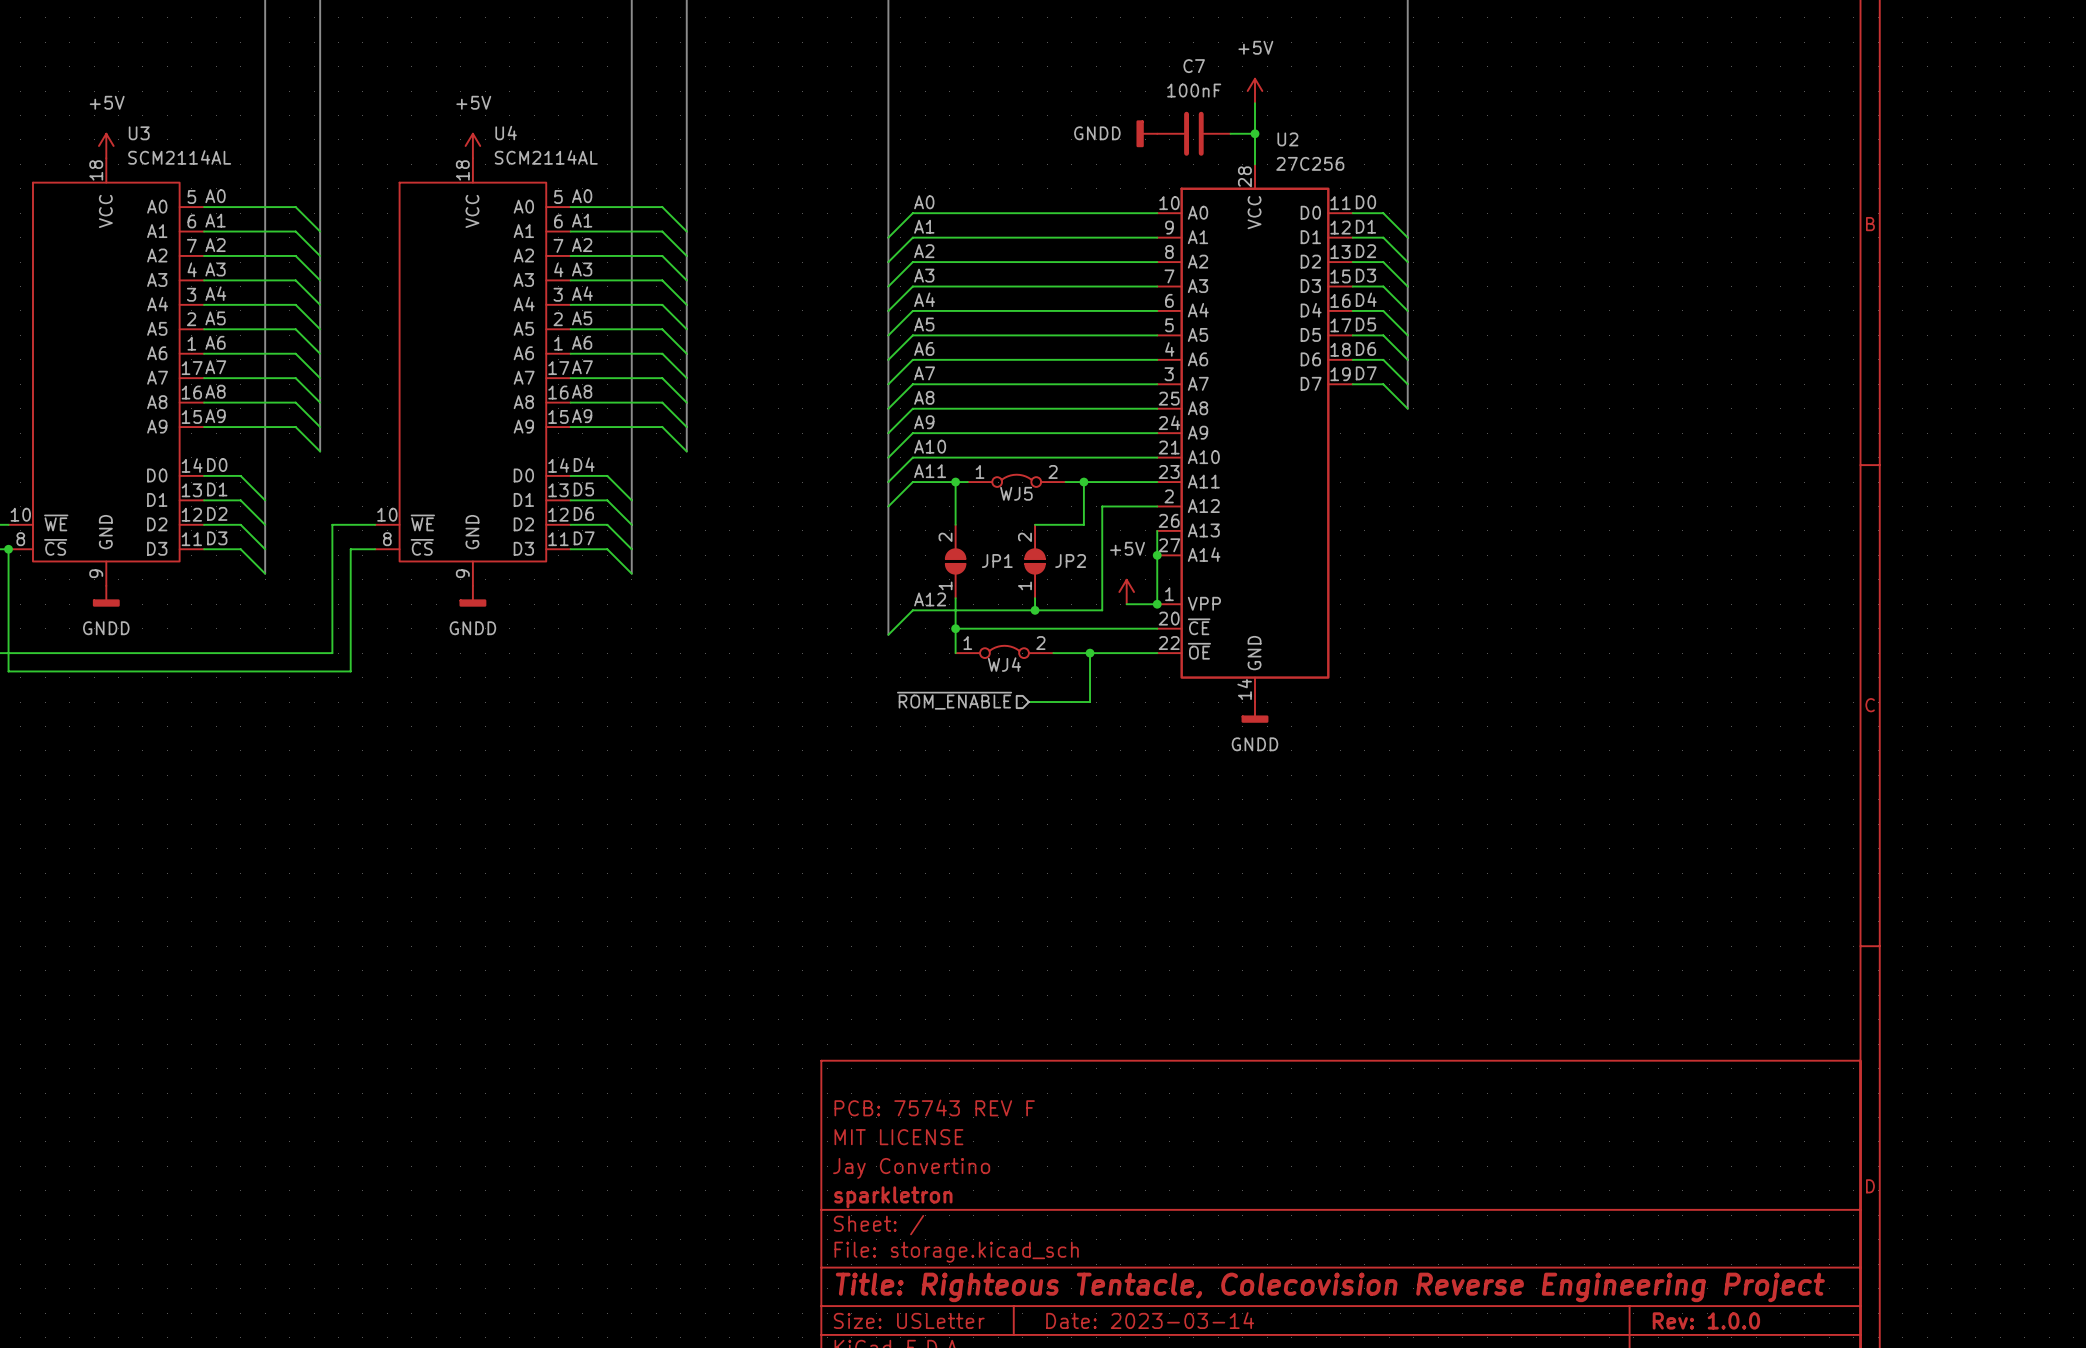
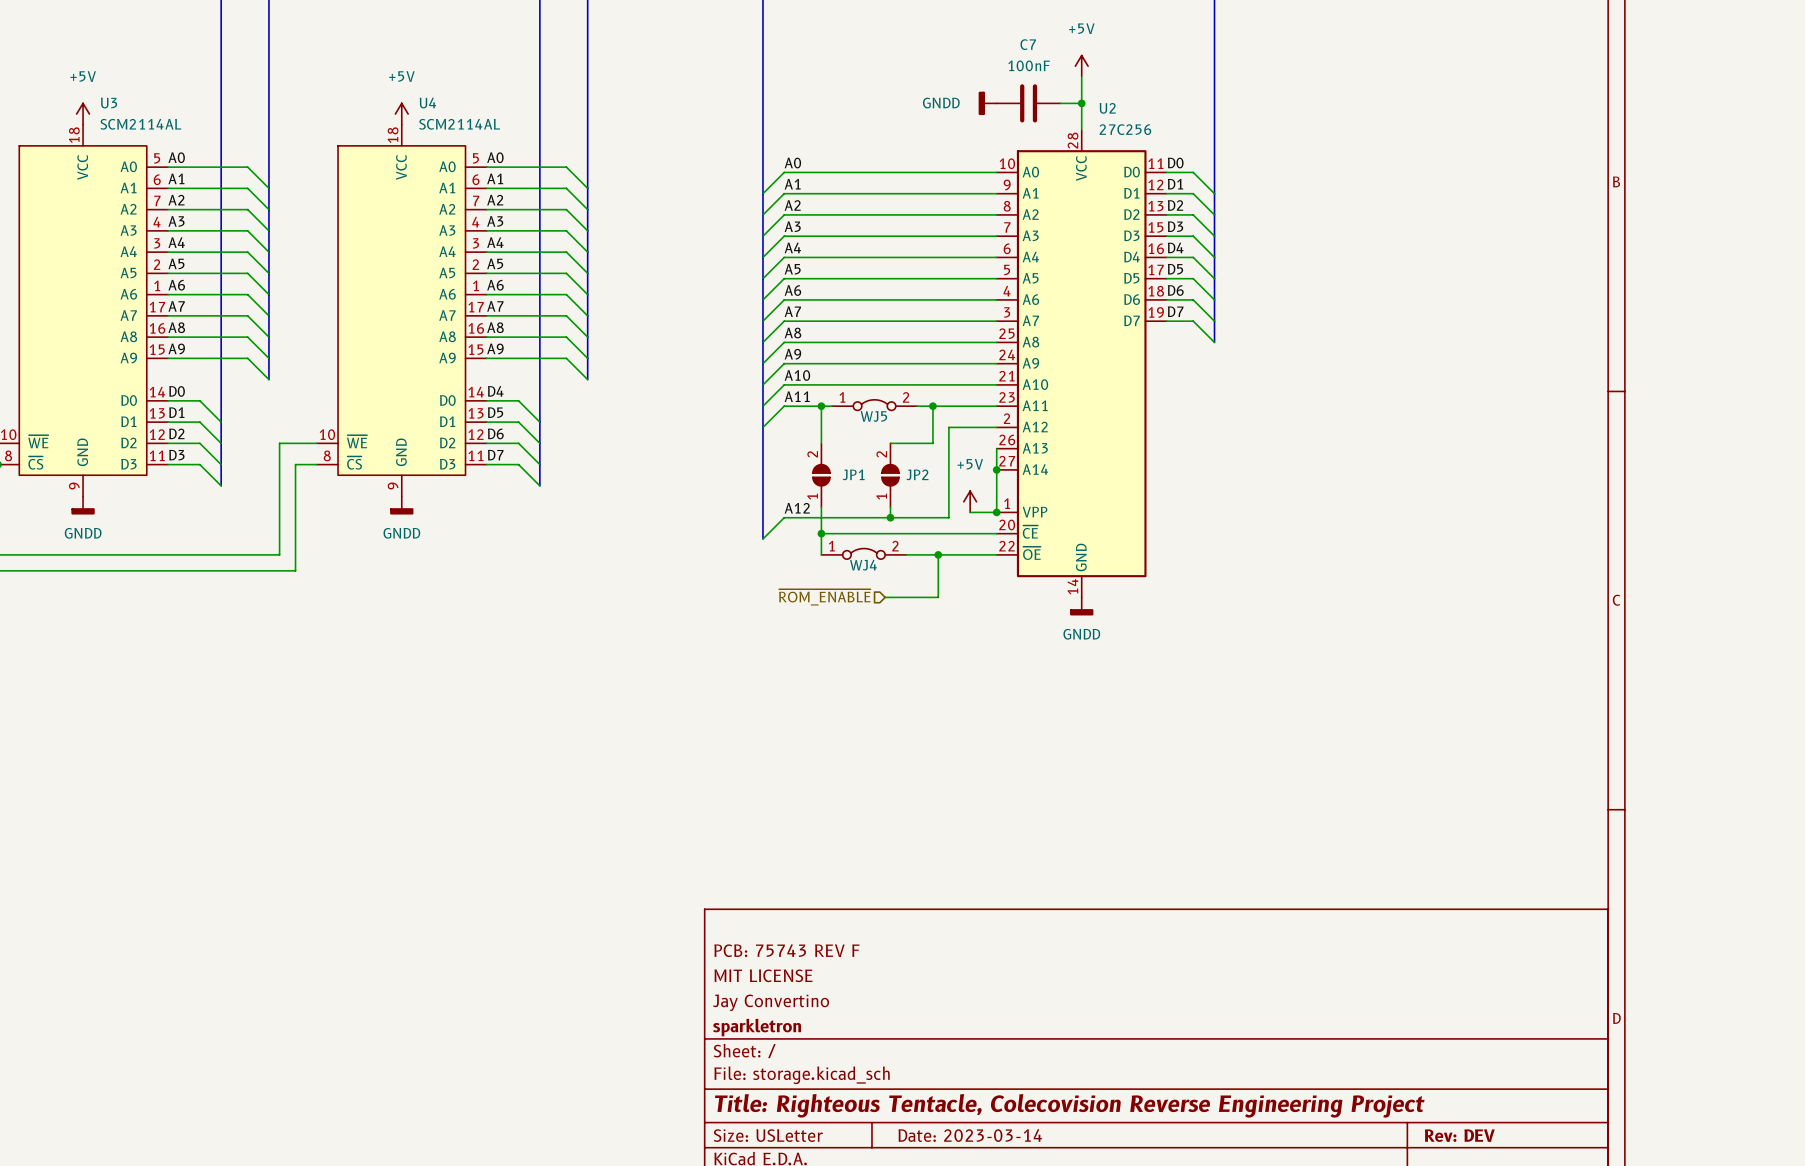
title block: Rev: 1.0.0 (1706, 1320) -> Rev: DEV (1459, 1135)

